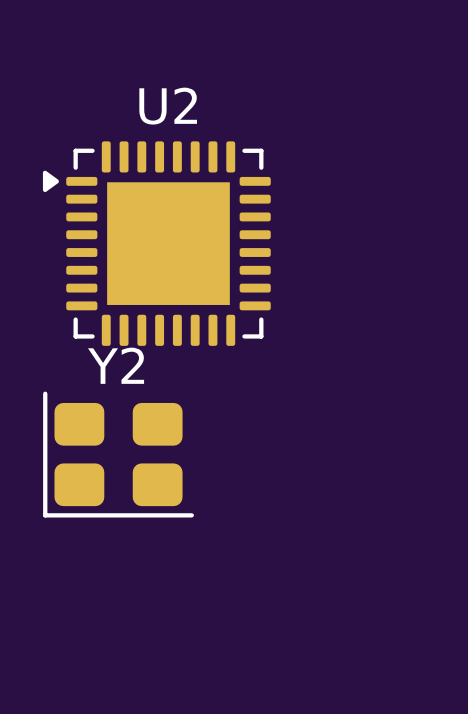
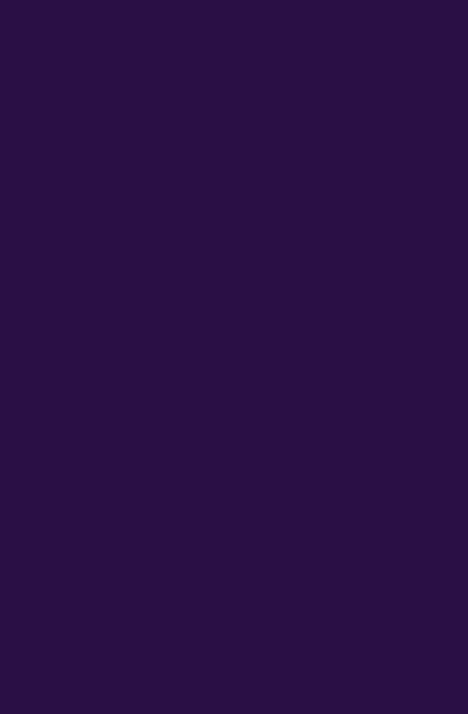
U2: (156, 243) -> none
Y2: (118, 454) -> none

